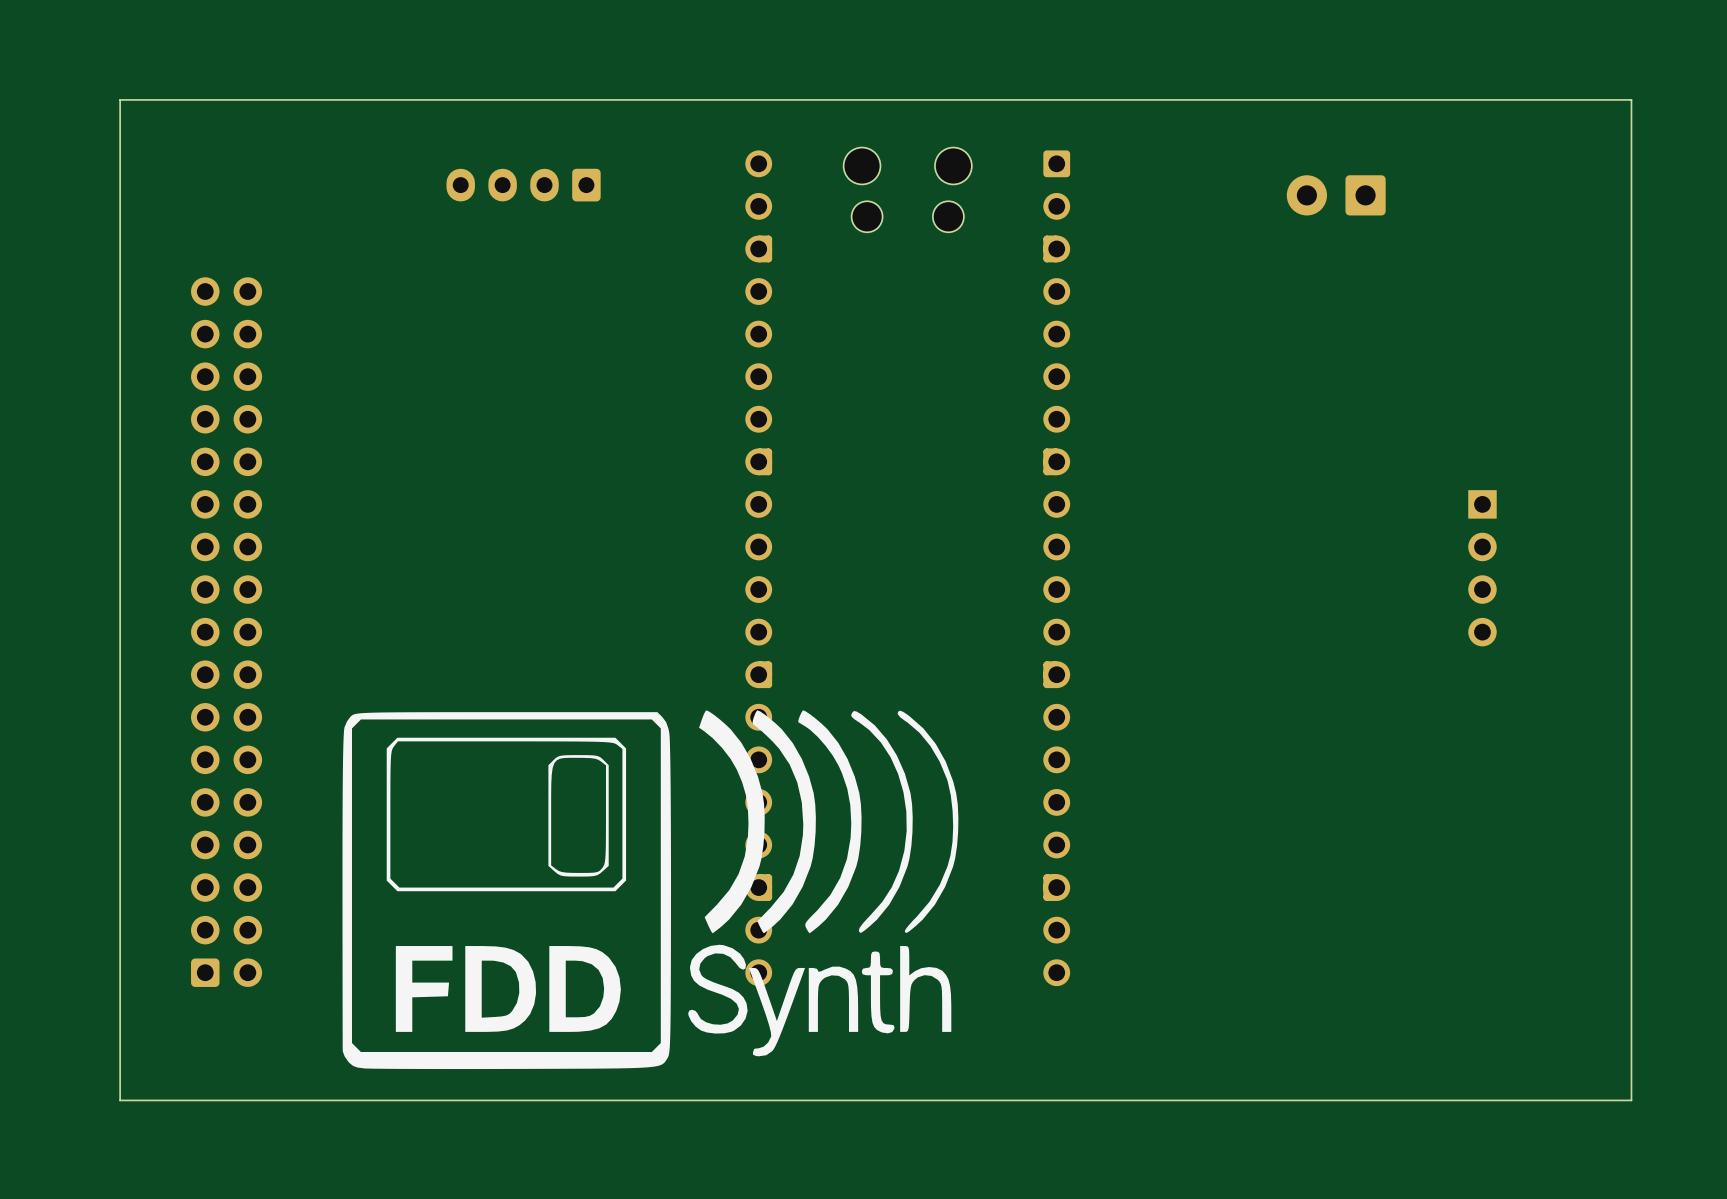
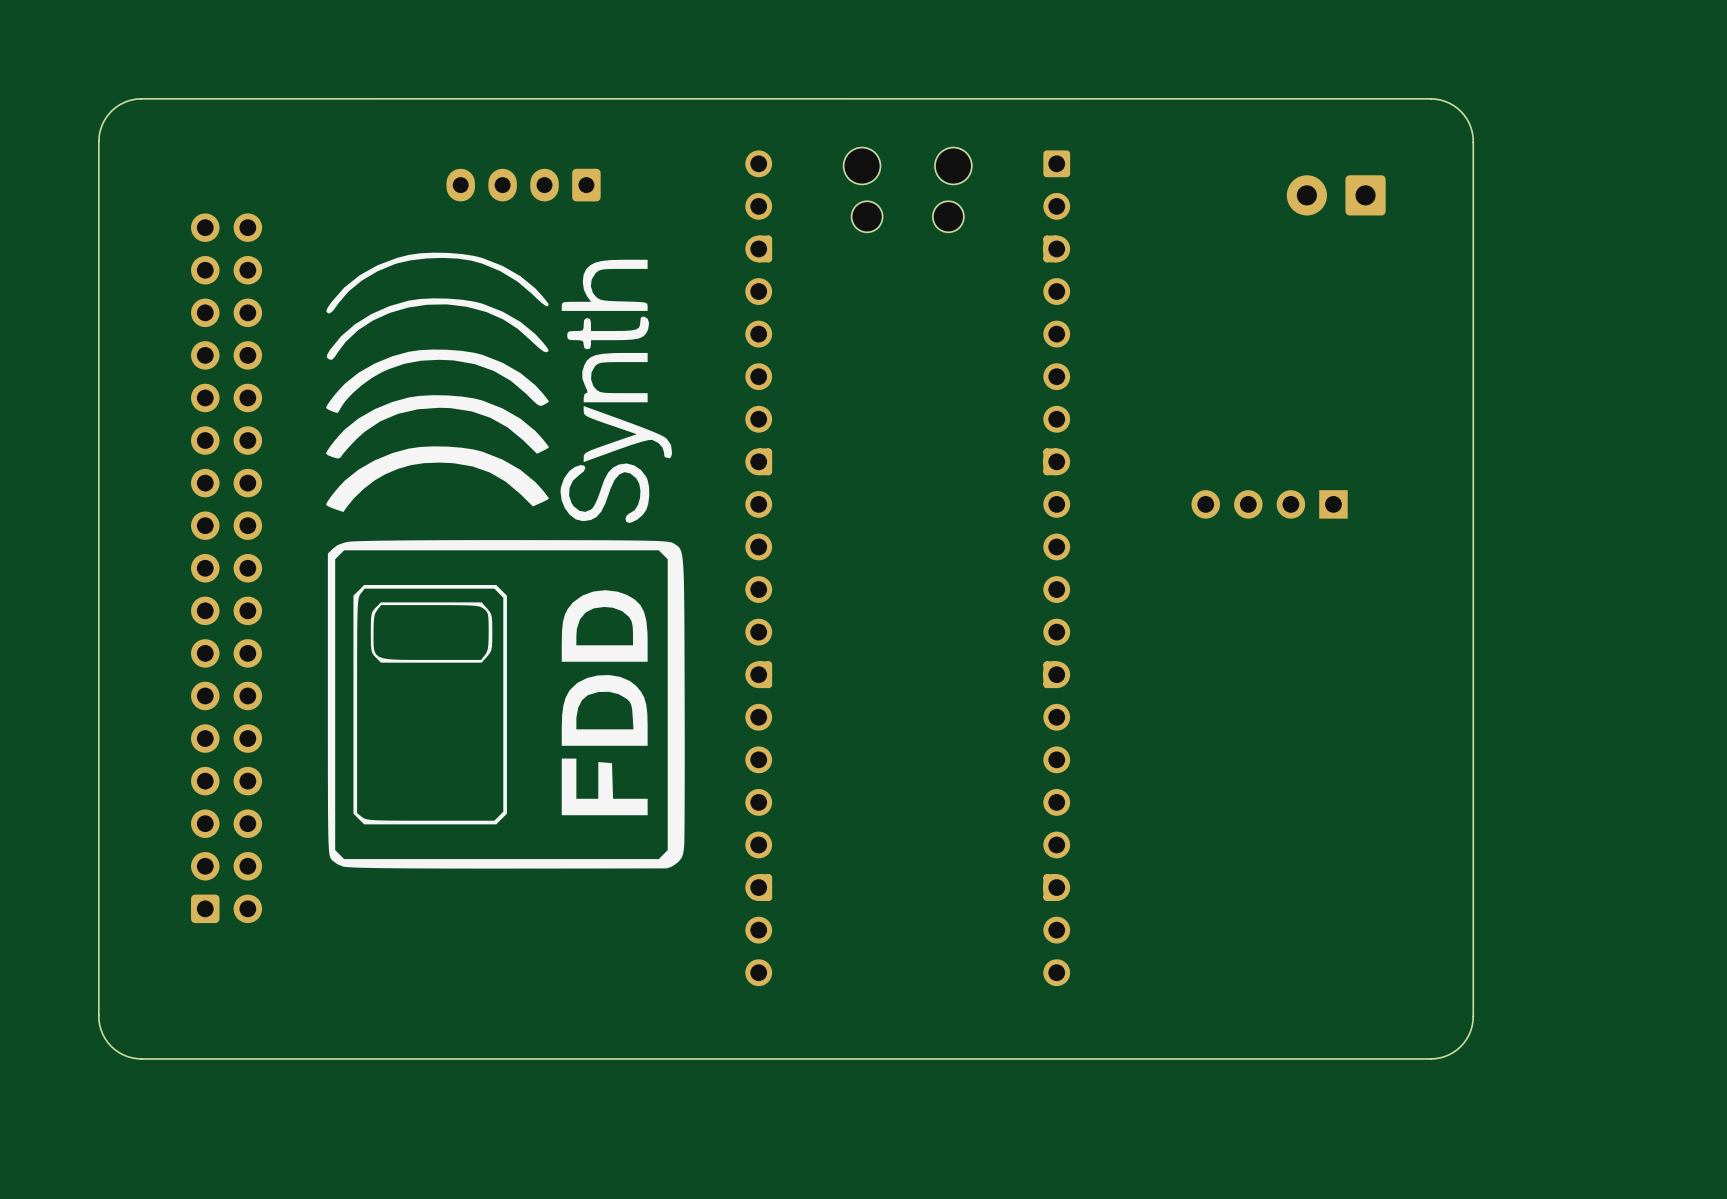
board edge: (1631, 99) (120, 99) (120, 1100) (1631, 1100) (1631, 99) -> (141, 1058) (127, 1056) (110, 1046) (100, 1029) (98, 1015) (98, 141) (104, 120) (115, 107) (125, 102) (141, 98) (1430, 98) (1449, 103) (1464, 115) (1471, 128) (1473, 142) (1473, 1016) (1469, 1034) (1457, 1049) (1444, 1056) (1430, 1058) (141, 1058)
drawing: none -> [326, 252, 685, 869]
part rotation: 0° (1482, 568) -> 90° clockwise (1269, 504)
part position: (1482, 568) -> (1269, 504)
part position: (226, 632) -> (226, 568)
drawing: [342, 710, 959, 1070] -> none

